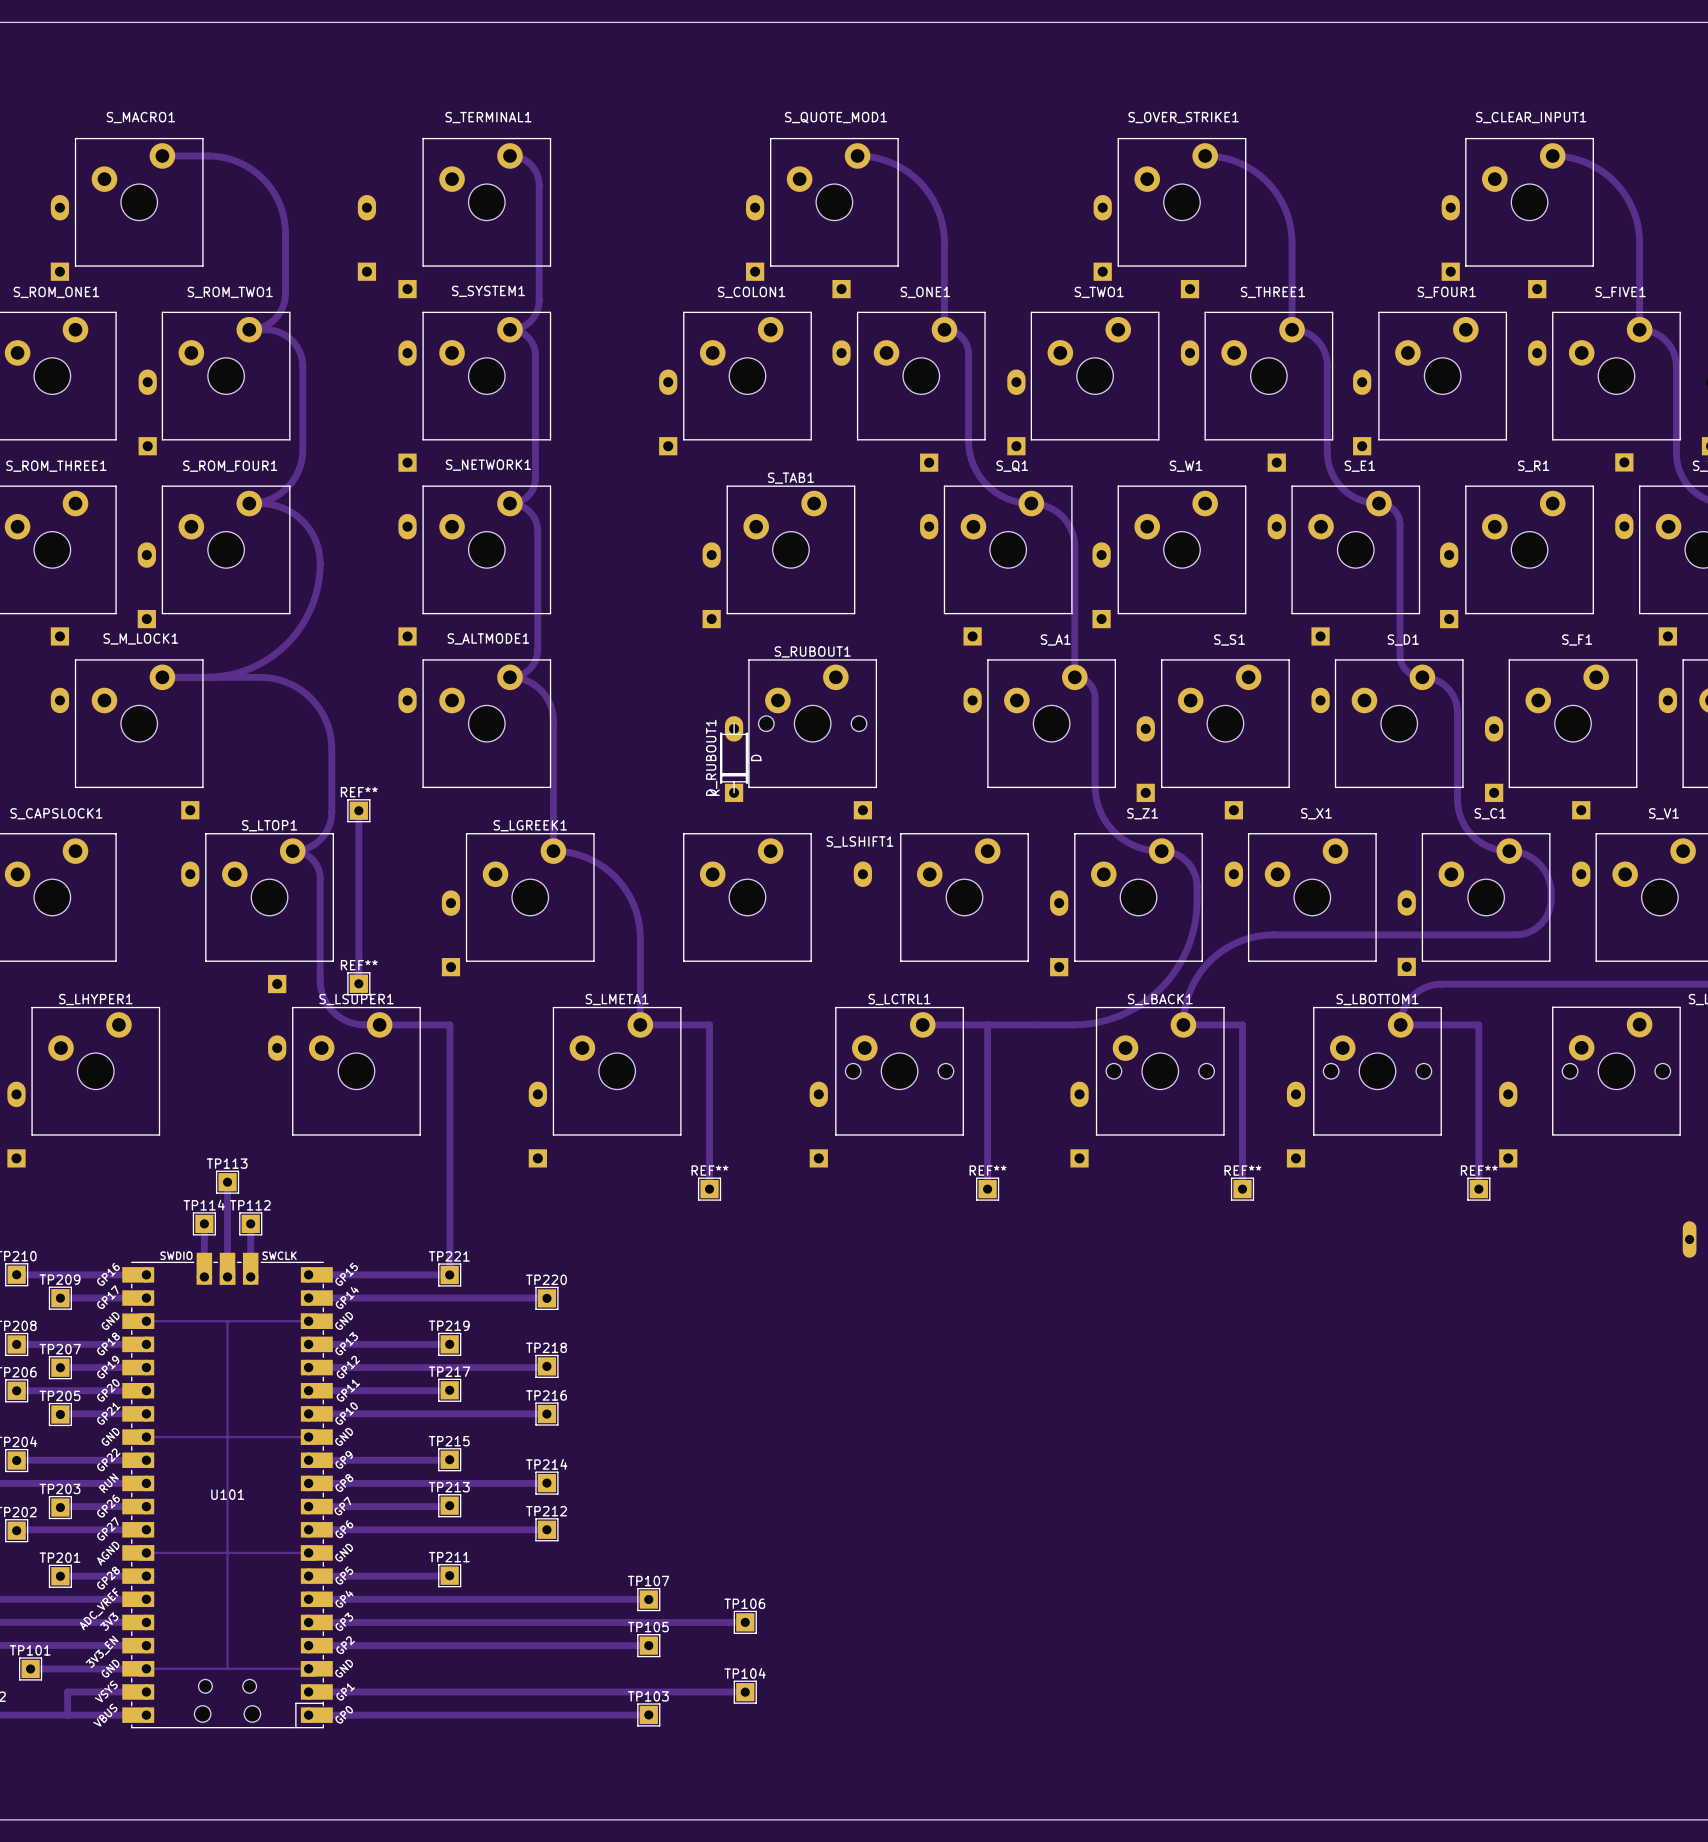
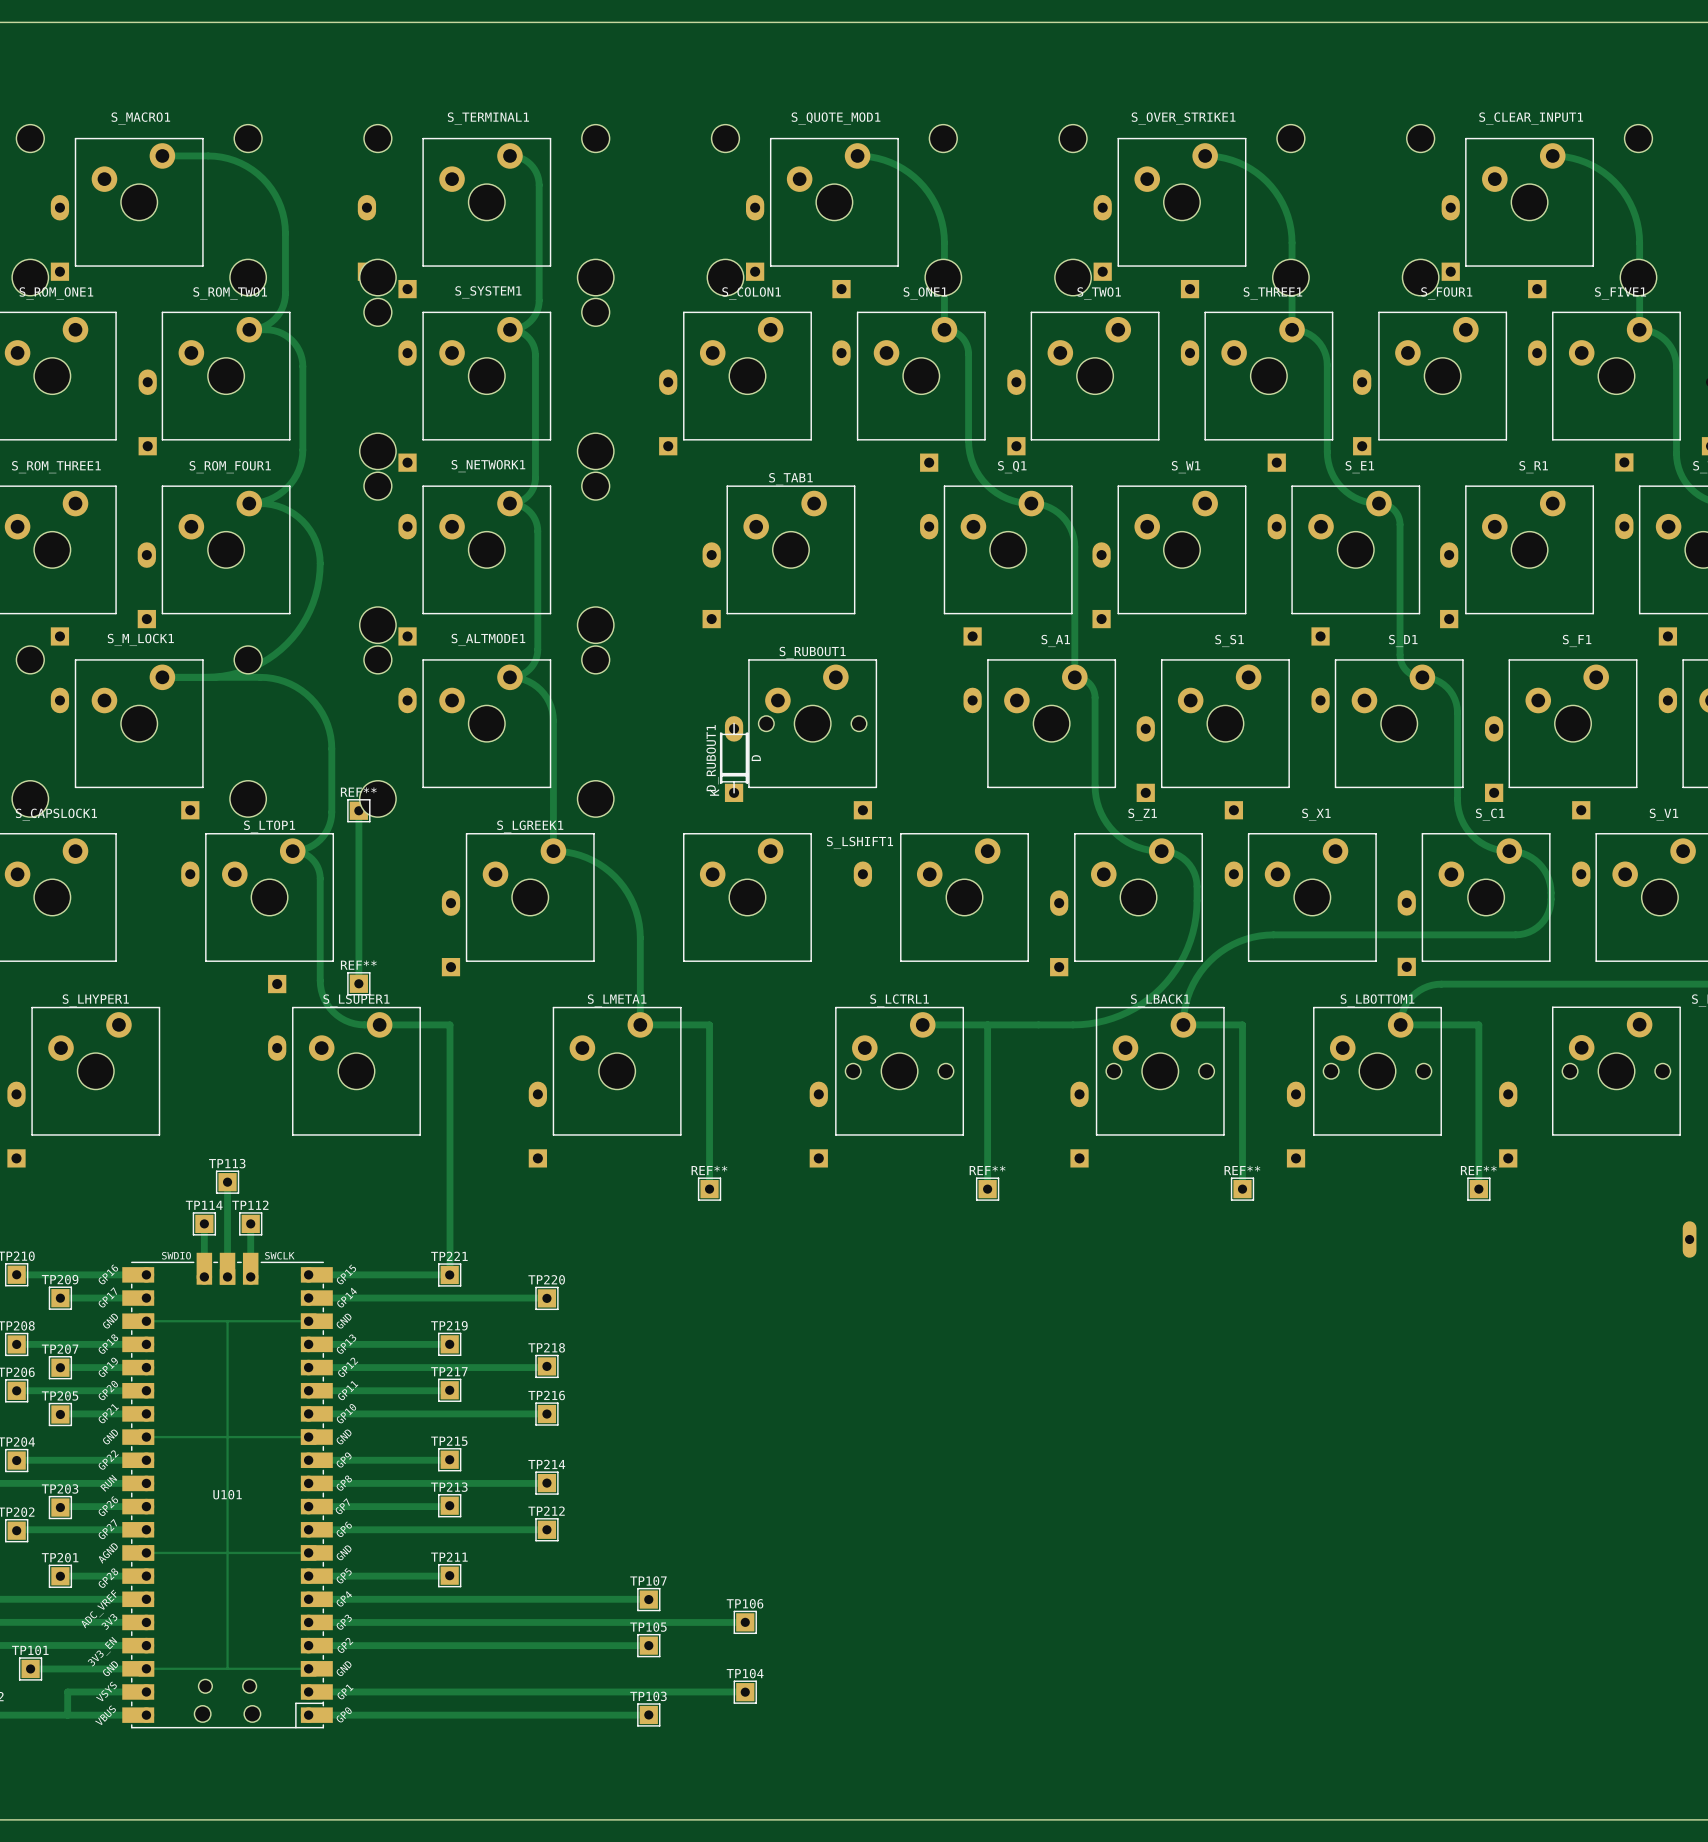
S_MACRO1 footprint: [74, 138, 204, 267] -> [12, 124, 267, 296]
S_TERMINAL1 footprint: [422, 138, 552, 267] -> [359, 124, 614, 296]
S_QUOTE_MOD1 footprint: [770, 138, 899, 267] -> [707, 124, 962, 296]
S_OVER_STRIKE1 footprint: [1117, 138, 1247, 267] -> [1054, 124, 1310, 296]
S_CLEAR_INPUT1 footprint: [1465, 138, 1594, 267] -> [1402, 124, 1657, 296]
S_SYSTEM1 footprint: [422, 311, 552, 441] -> [359, 298, 614, 470]
S_NETWORK1 footprint: [422, 485, 552, 615] -> [359, 472, 614, 644]
S_M_LOCK1 footprint: [74, 659, 204, 788] -> [12, 646, 267, 818]
S_ALTMODE1 footprint: [422, 659, 552, 788] -> [359, 646, 614, 818]

